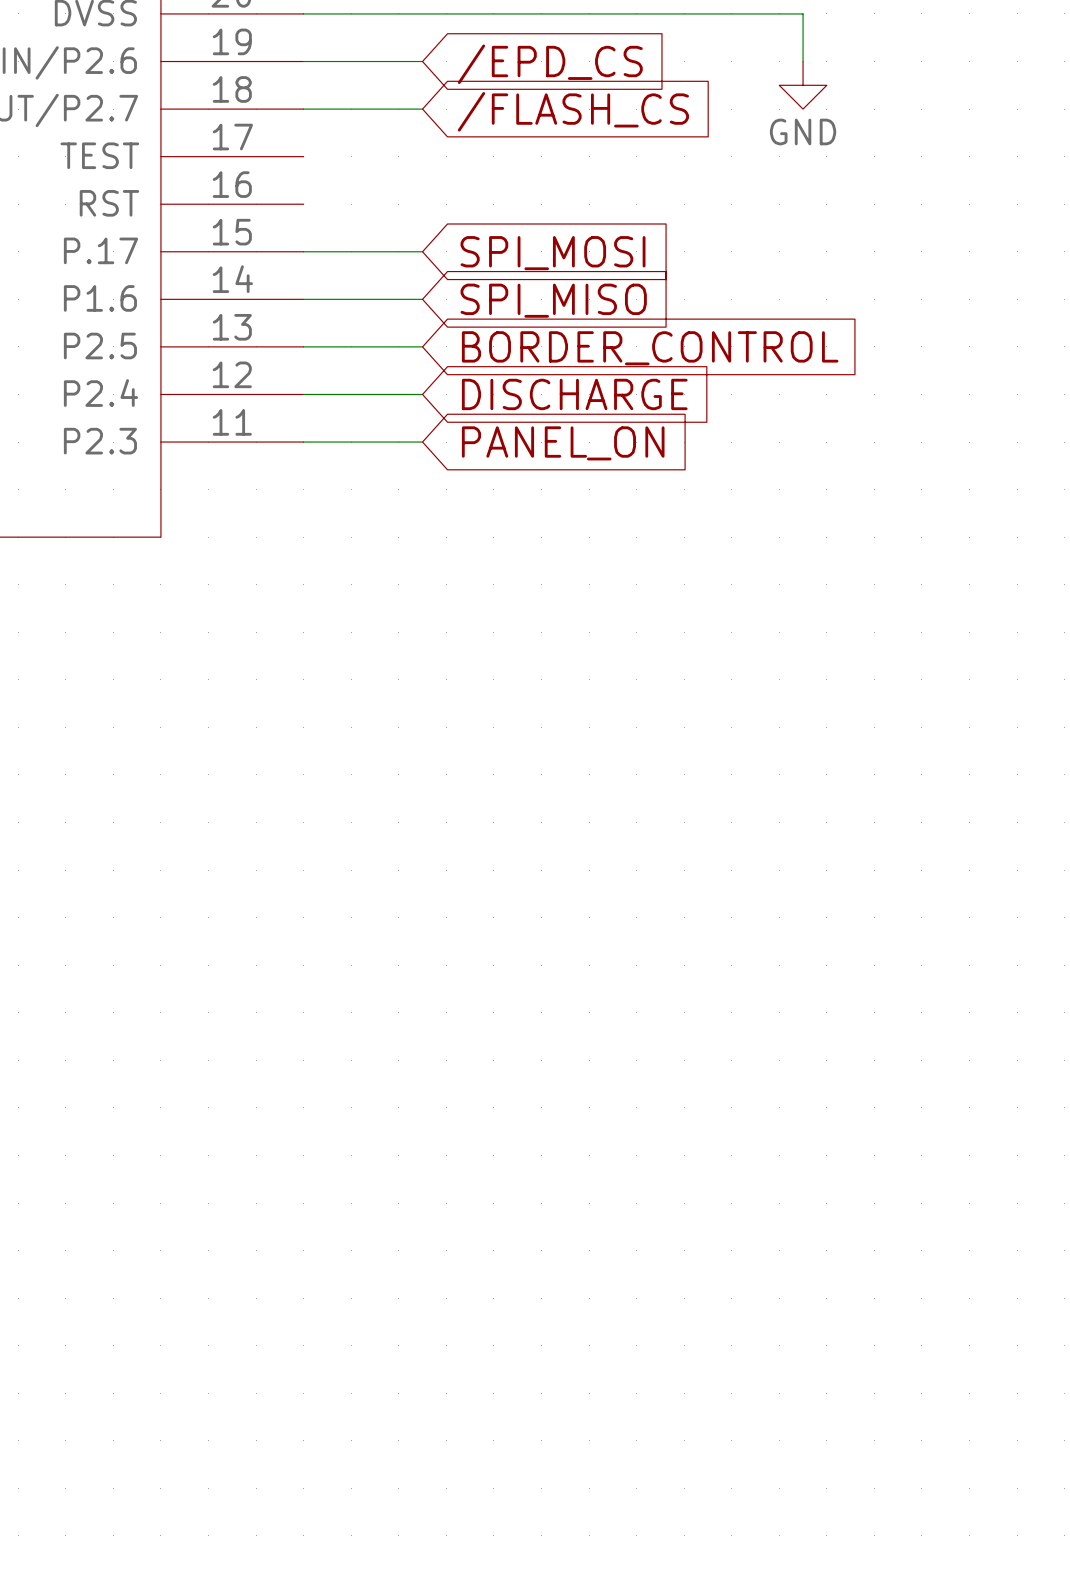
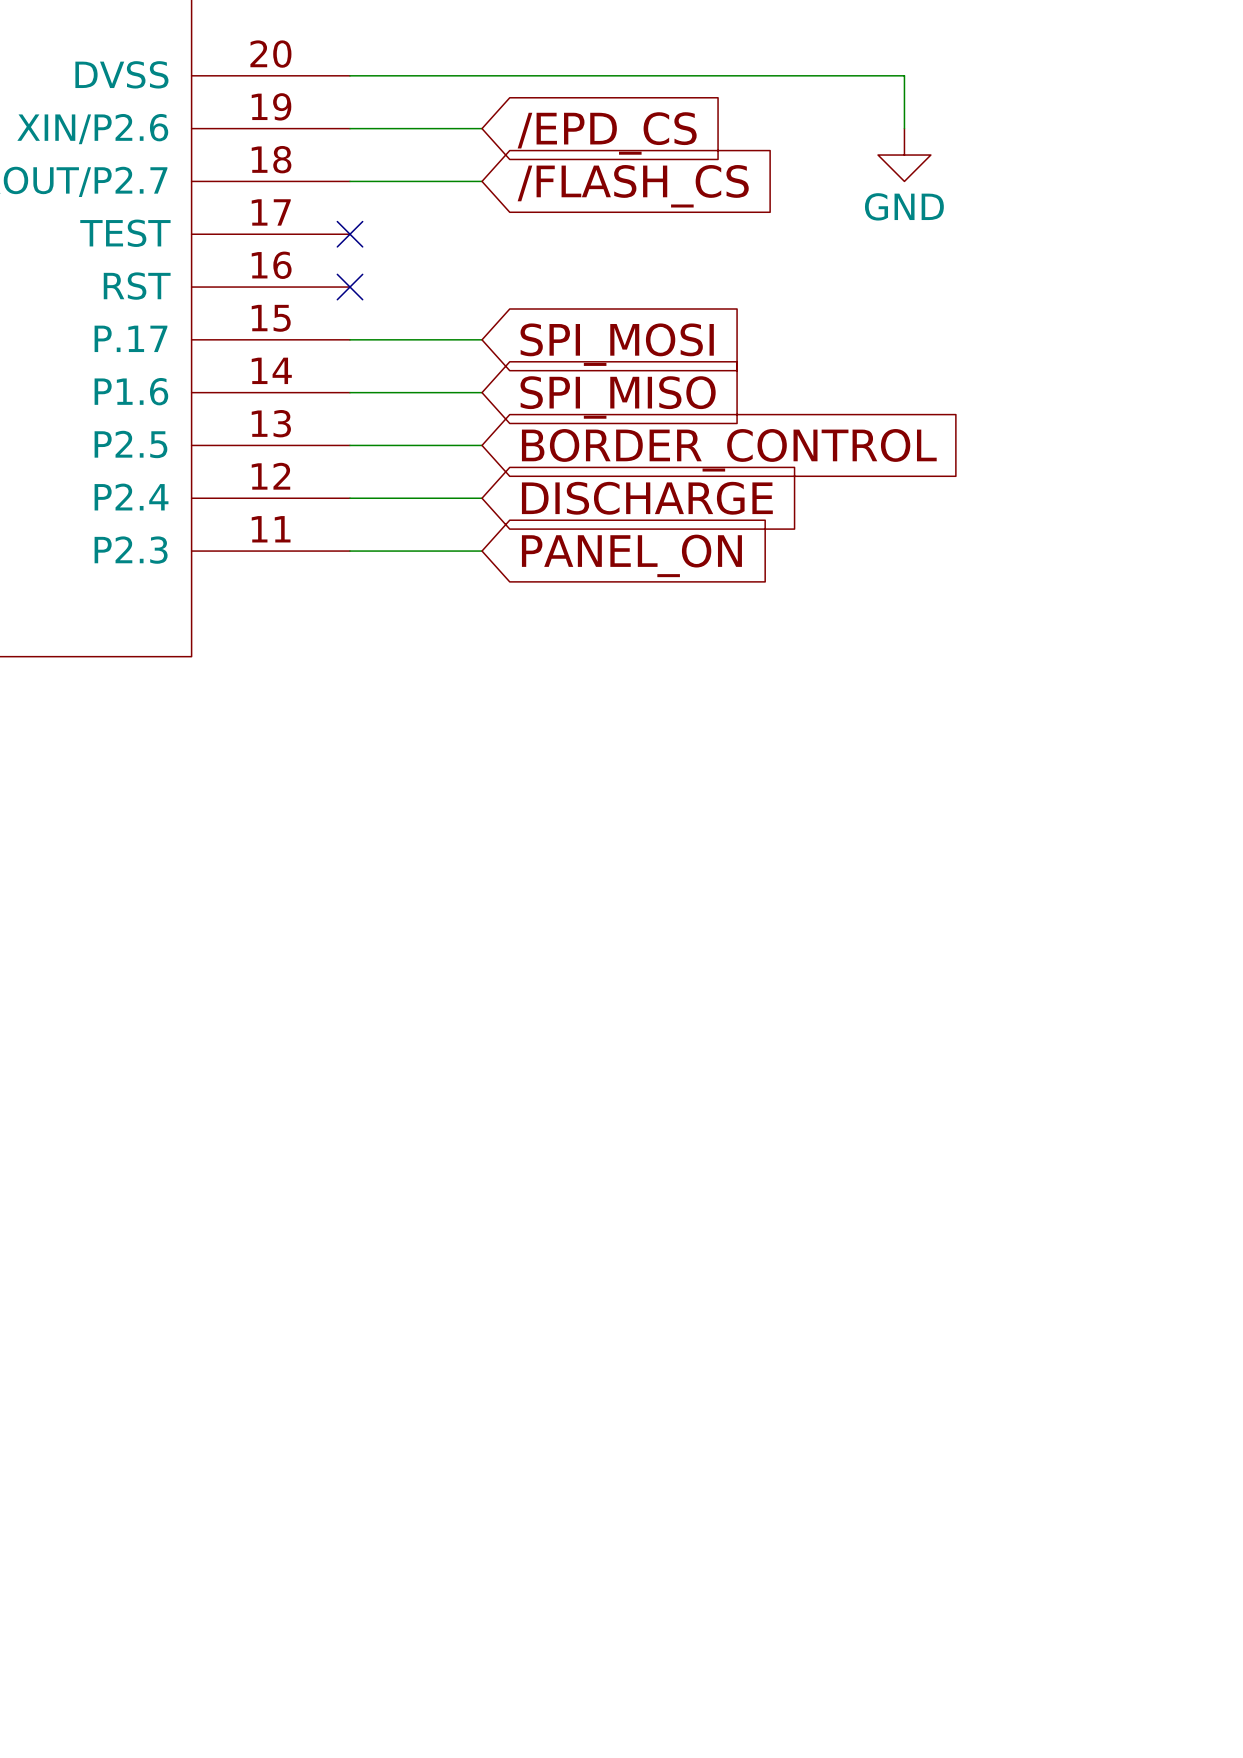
no-connect mark: none -> (350, 234)
no-connect mark: none -> (350, 287)

